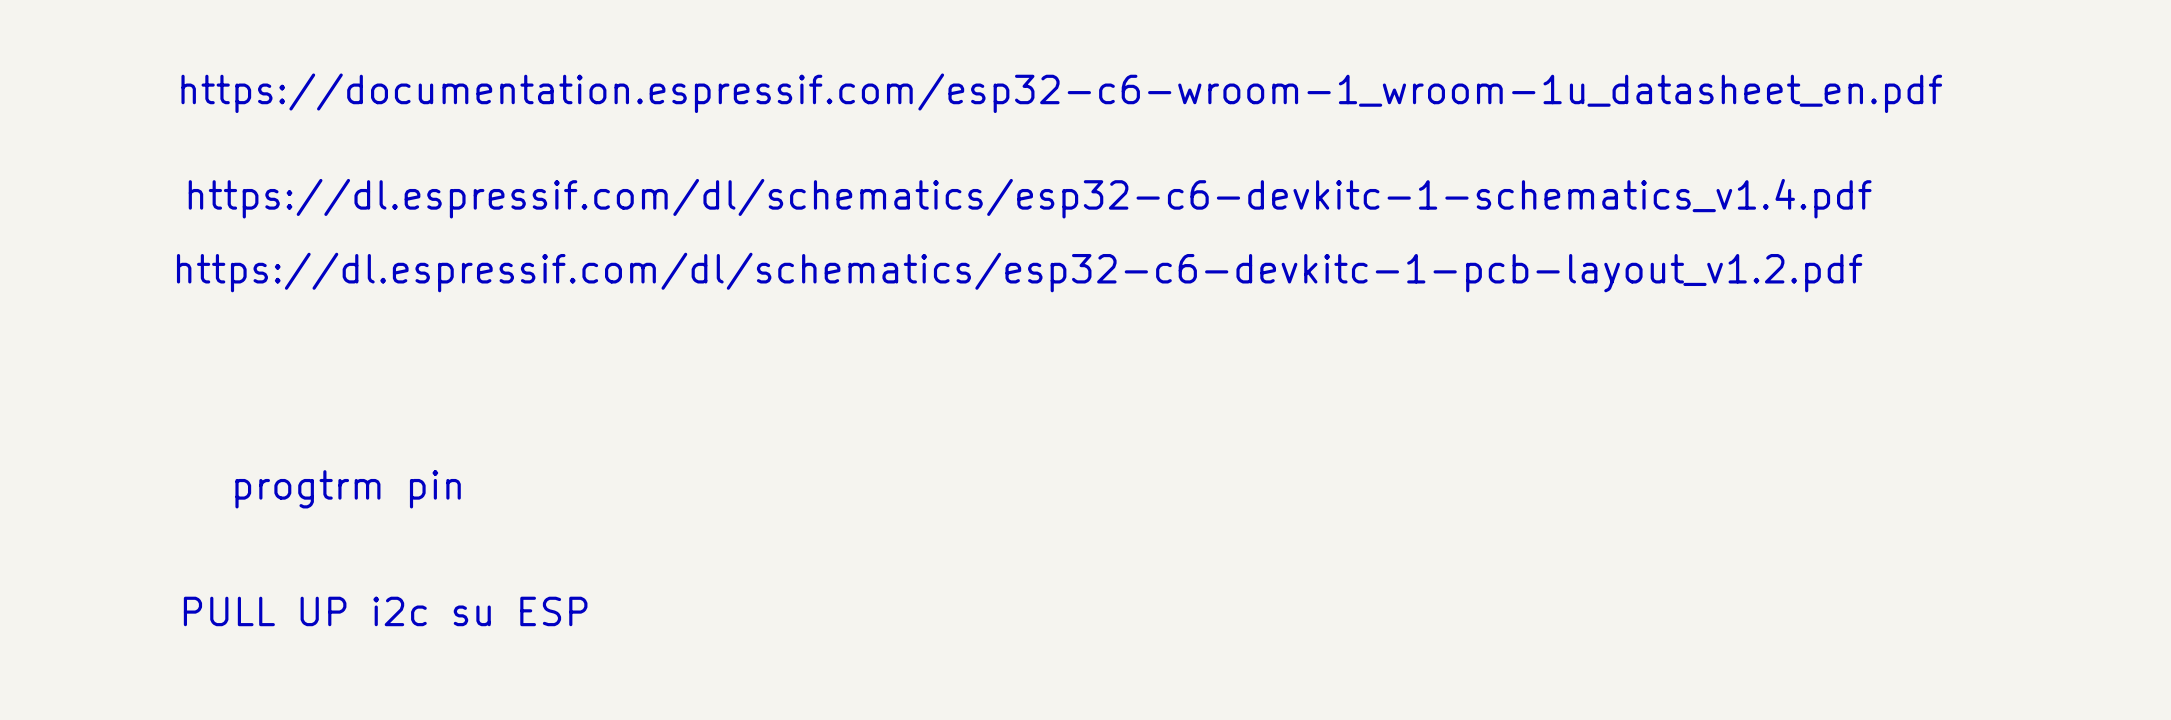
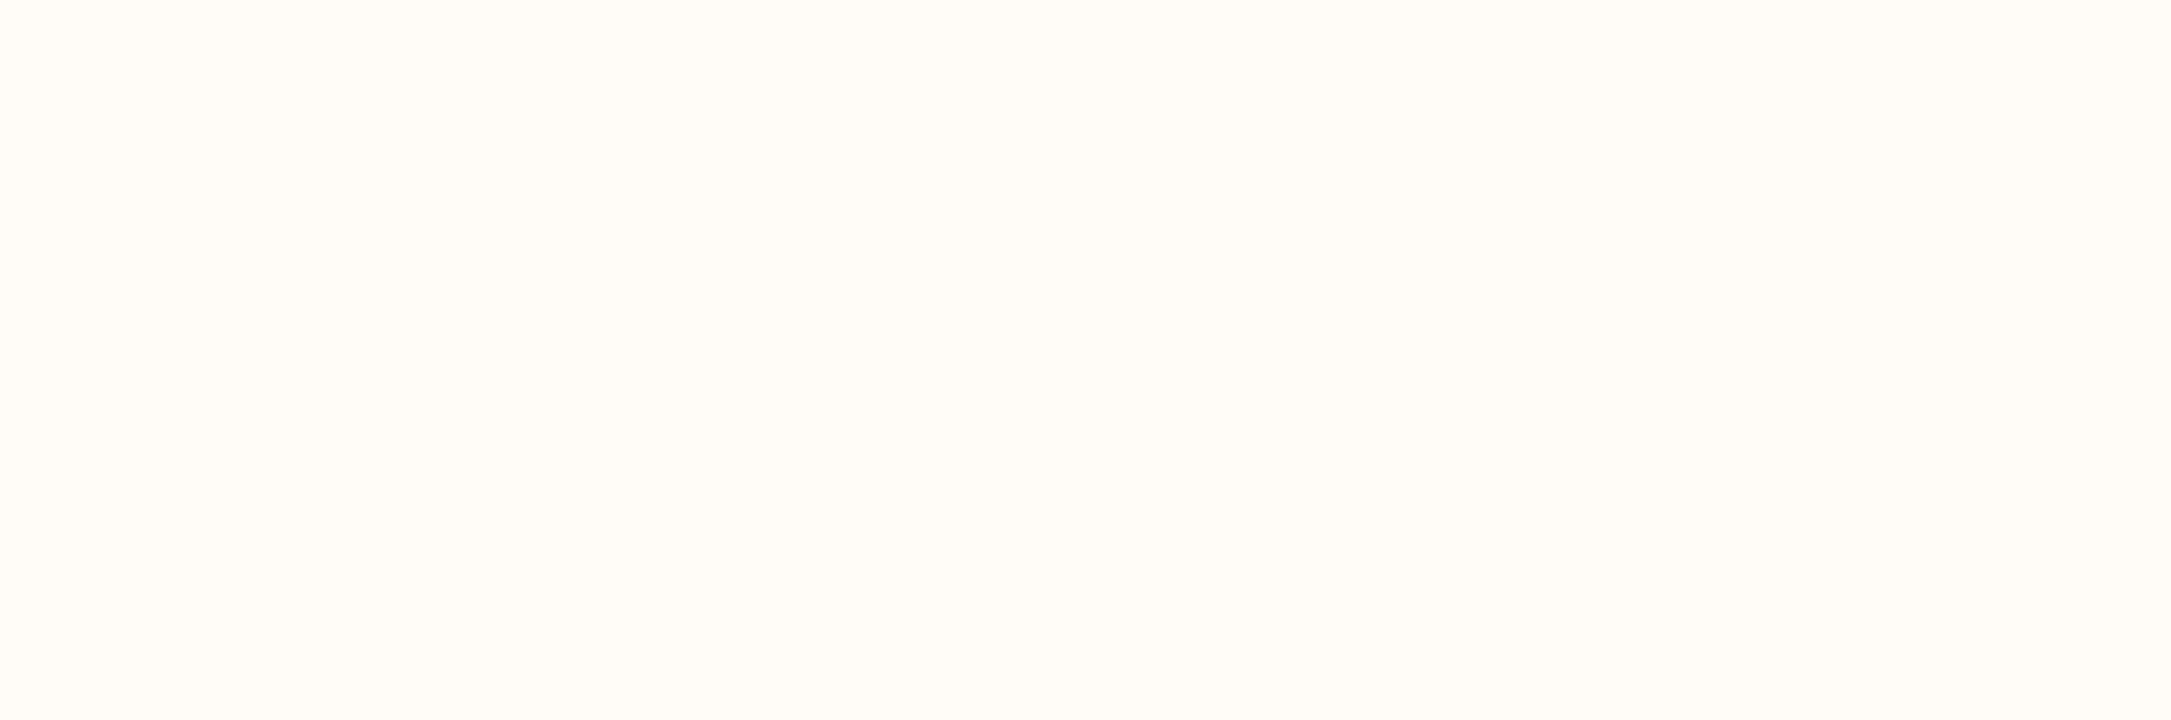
text: https://documentation.espressif.com/esp32-c6-wroom-1_wroom-1u_datasheet_en.pdf (1061, 93) -> none
text: https://dl.espressif.com/dl/schematics/esp32-c6-devkitc-1-schematics_v1.4.pdf (1030, 198) -> none
text: https://dl.espressif.com/dl/schematics/esp32-c6-devkitc-1-pcb-layout_v1.2.pdf (1019, 272) -> none
text: progtrm pin (348, 489) -> none
text: PULL UP i2c su ESP (385, 611) -> none

